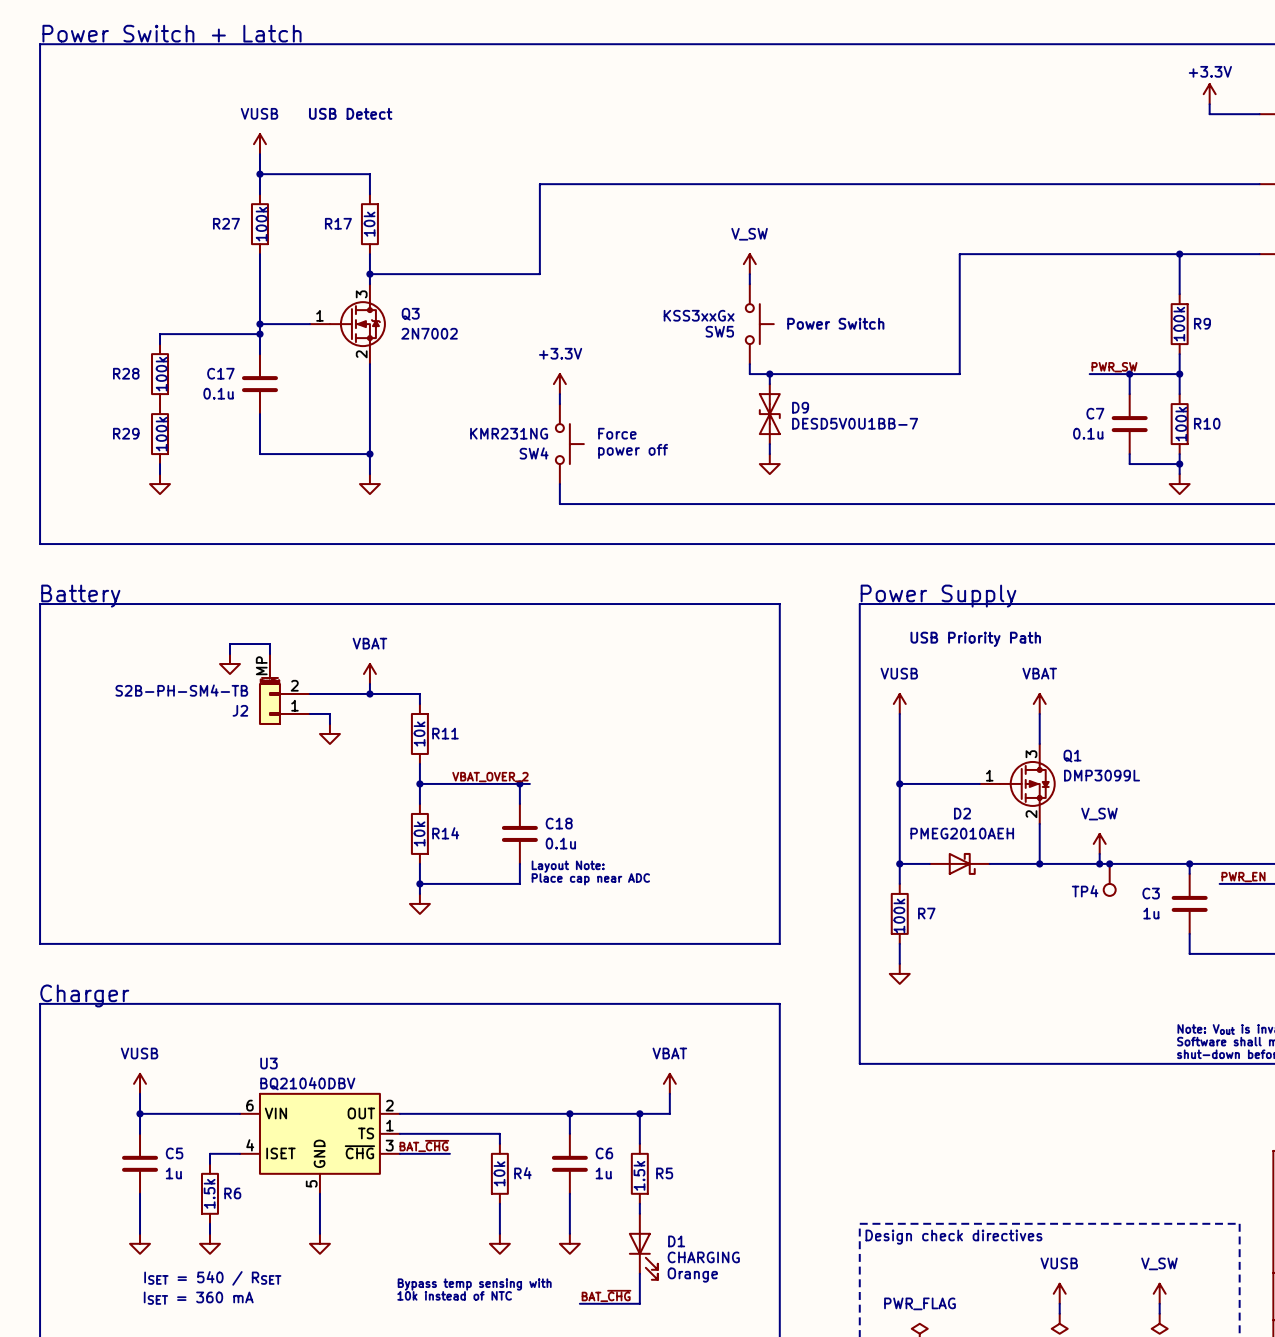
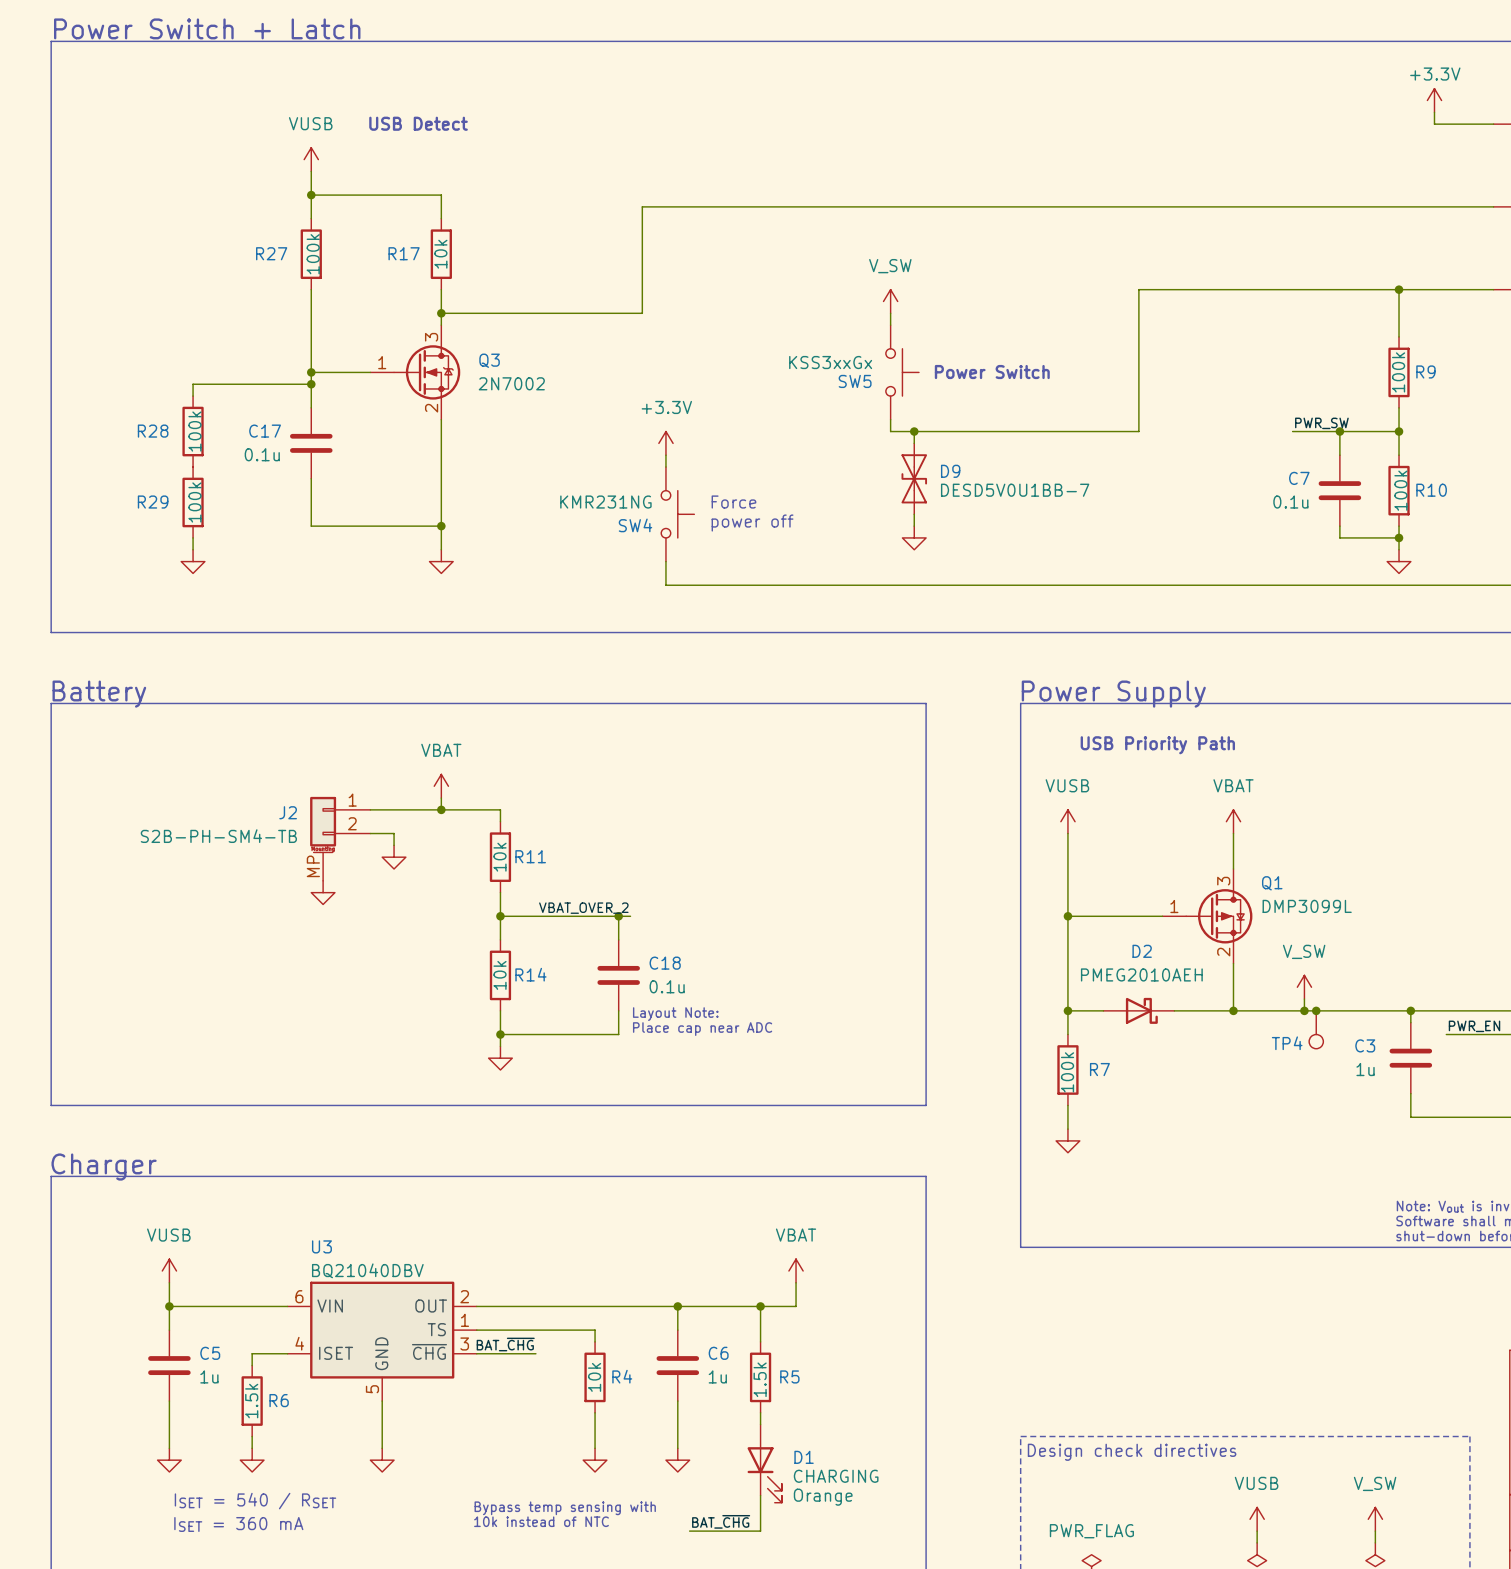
wire: (229, 654) (229, 644) (269, 644) (269, 654) -> none
power symbol position: (229, 664) -> (323, 892)
J2 flip: as is (269, 701) -> up-down (323, 825)

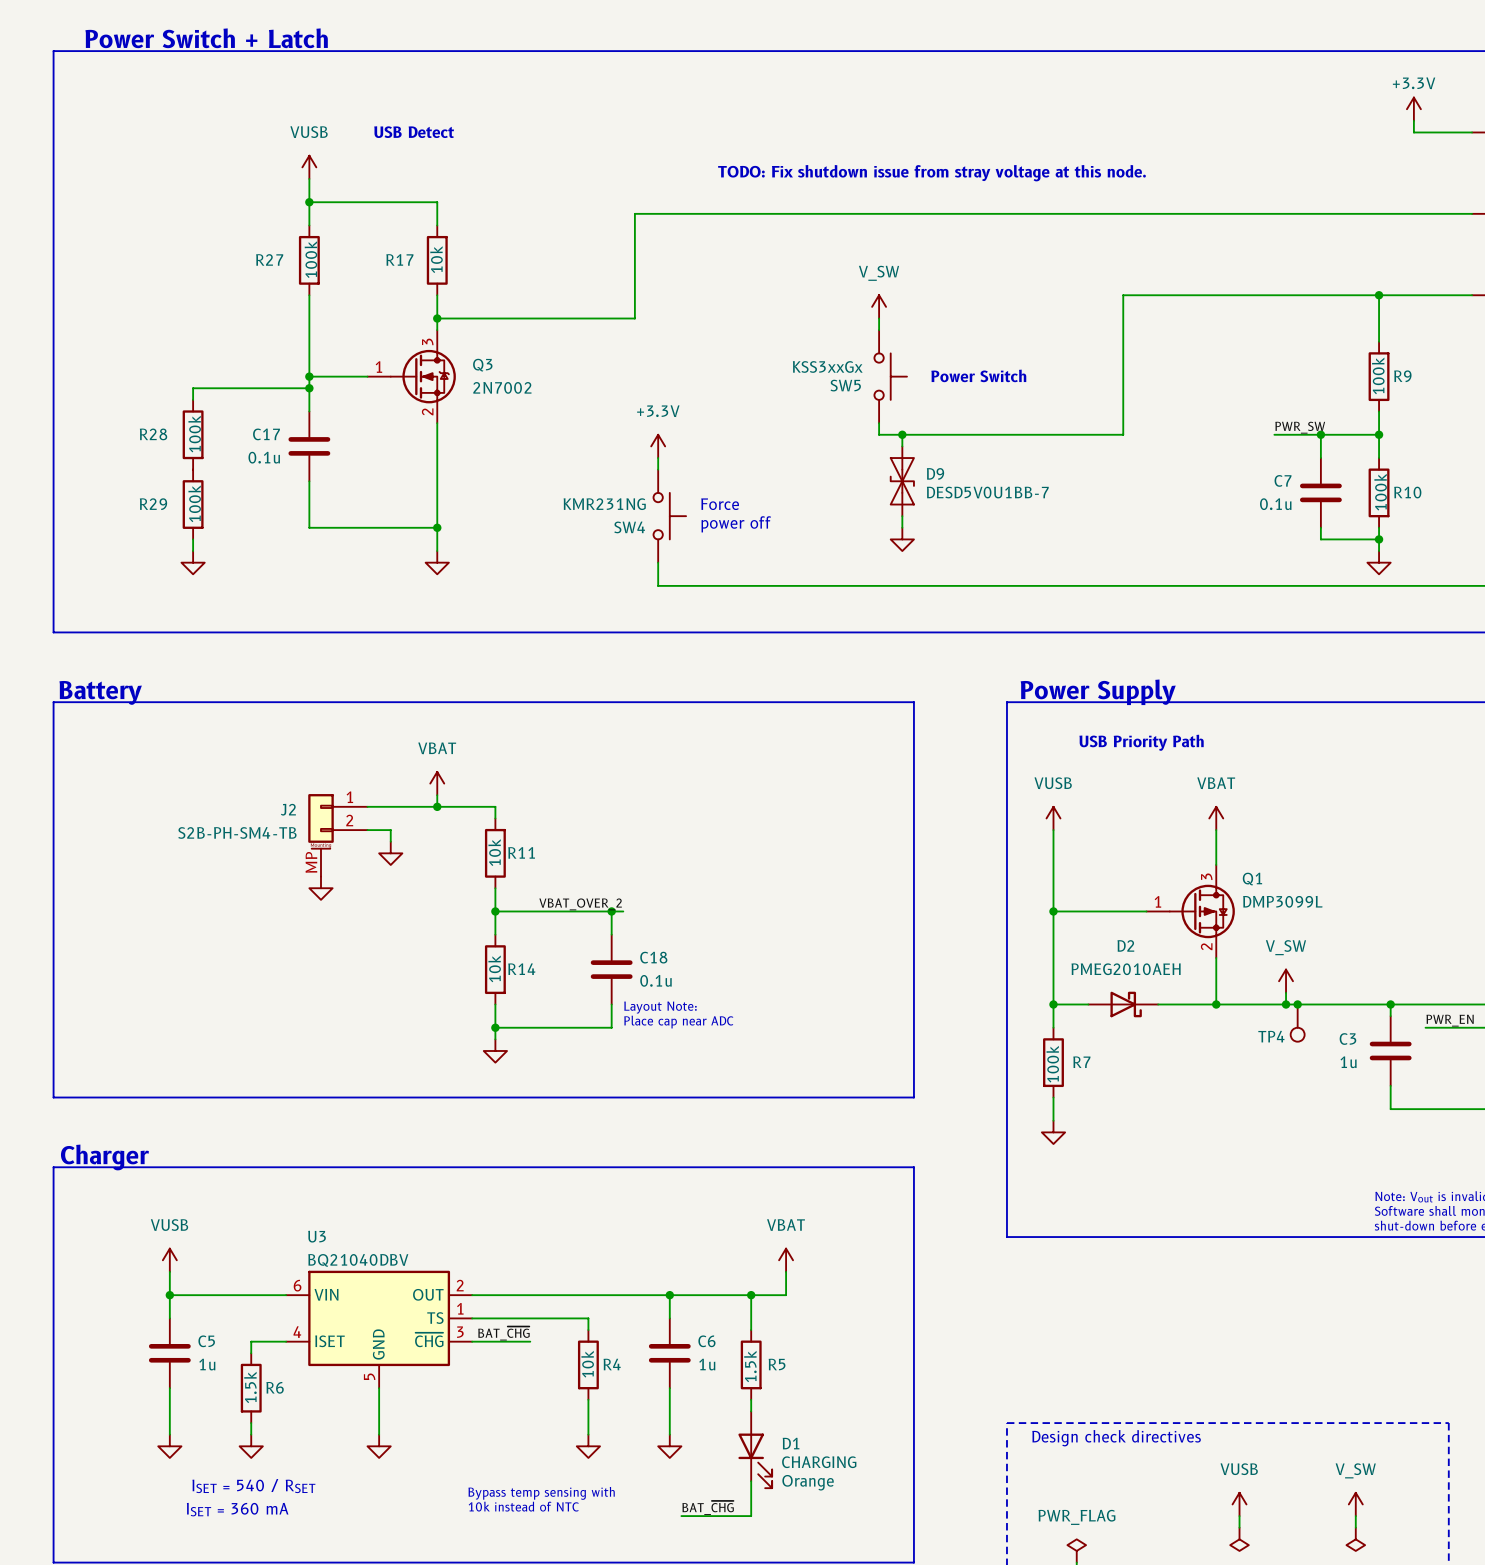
text: none -> TODO: Fix shutdown issue from stray voltage at this node. (931, 173)

